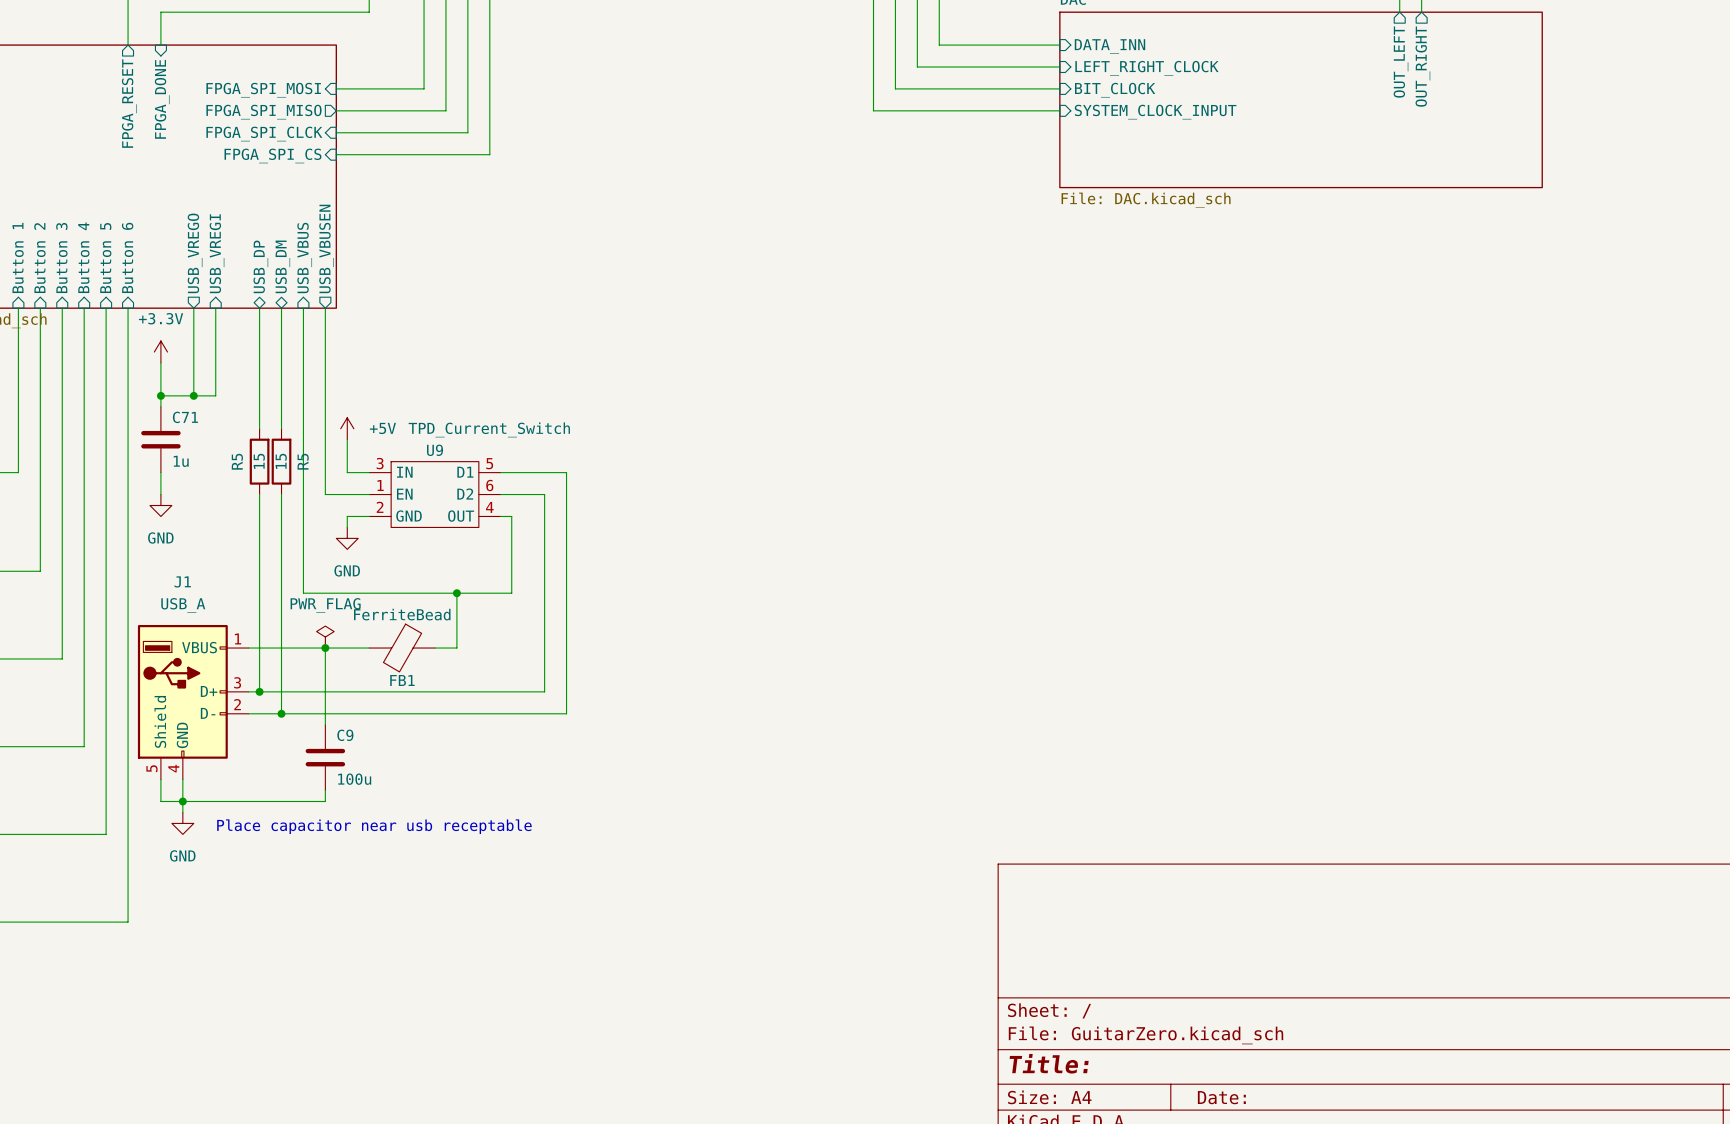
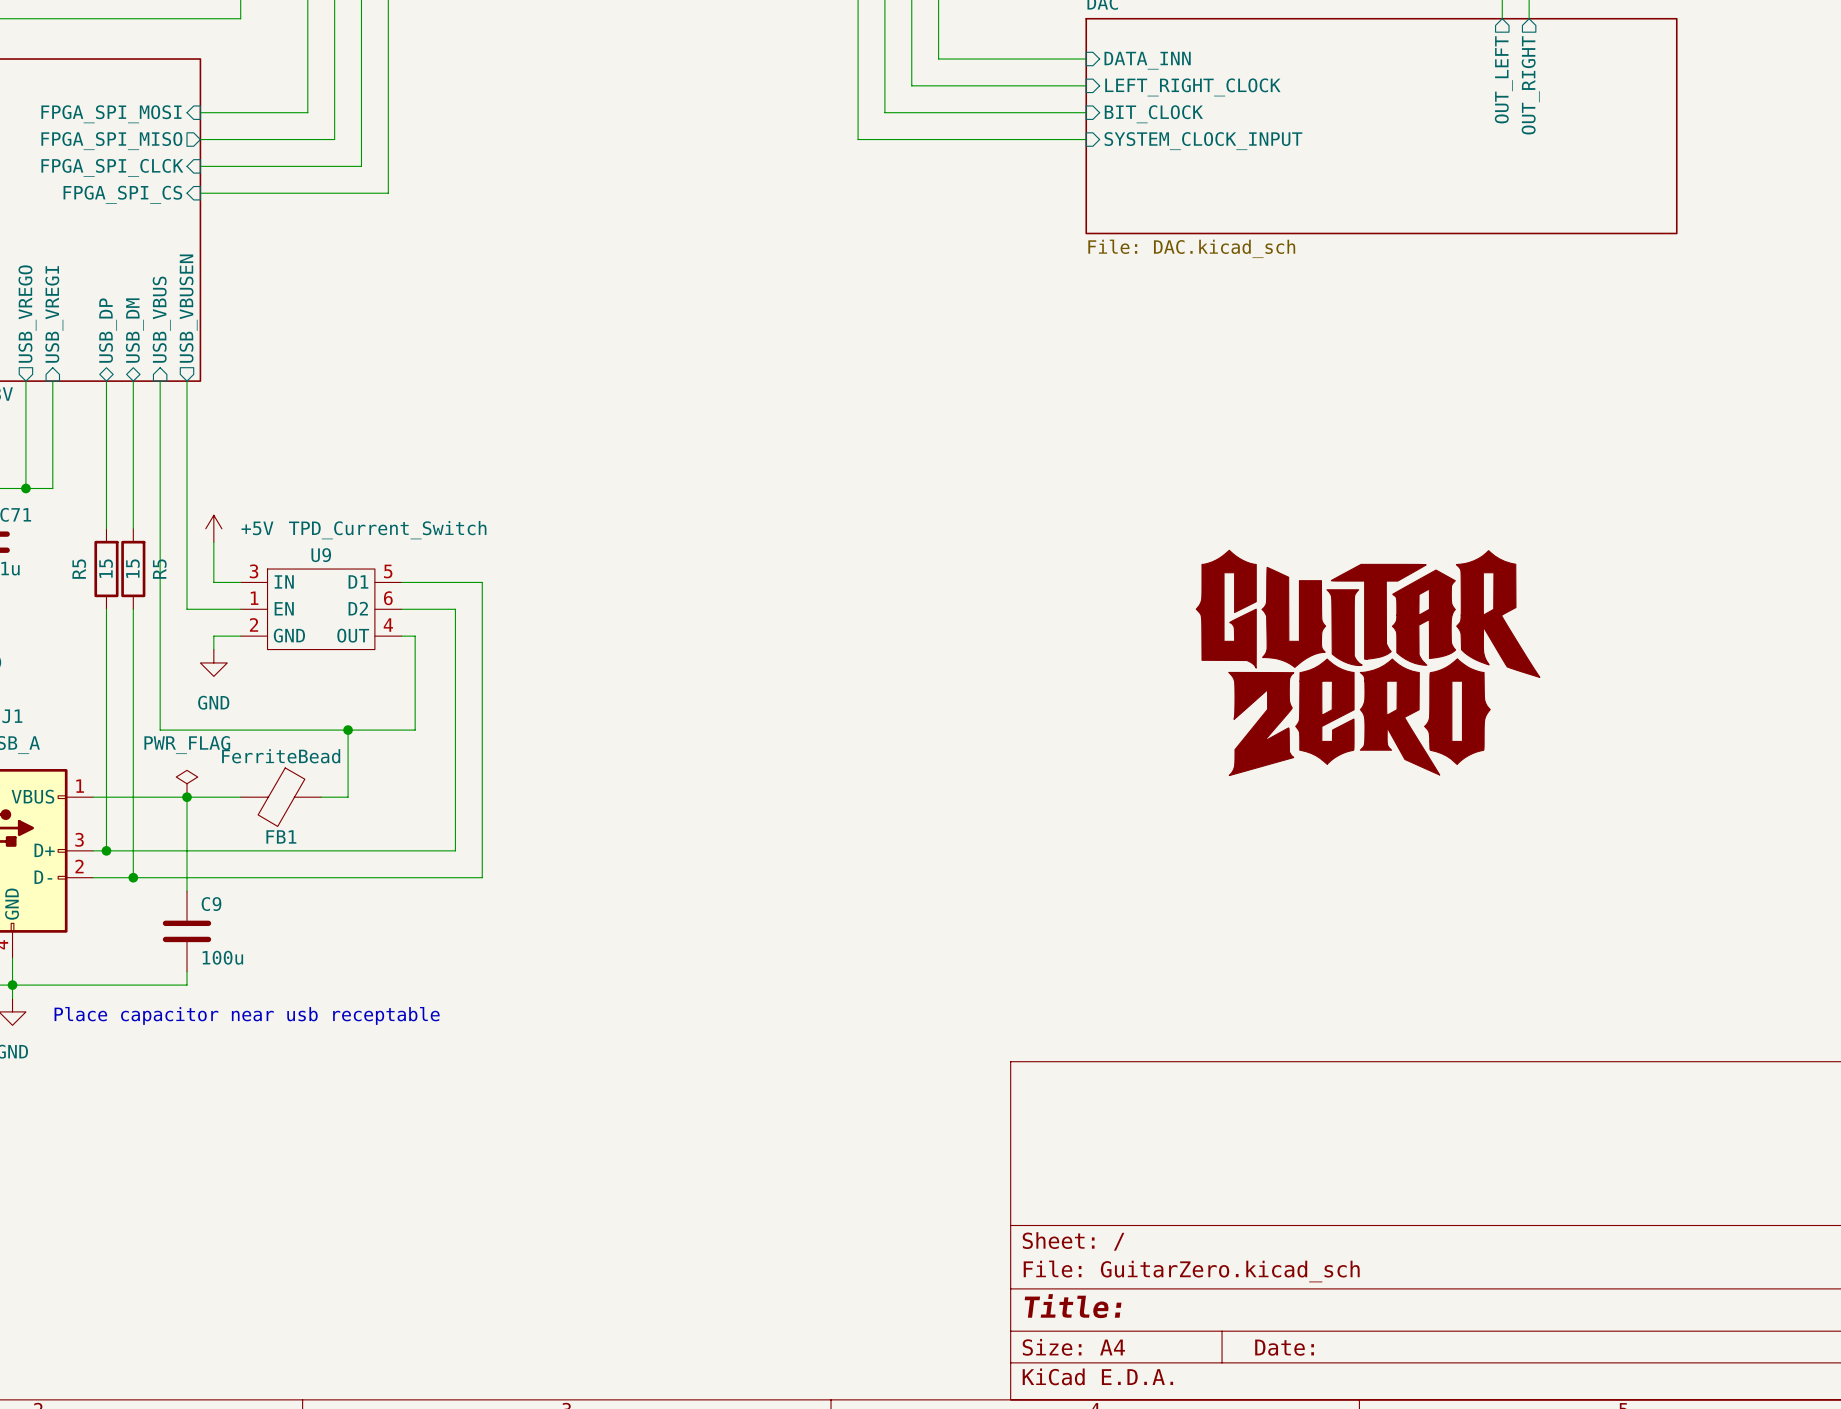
power symbol: none -> (1367, 662)

